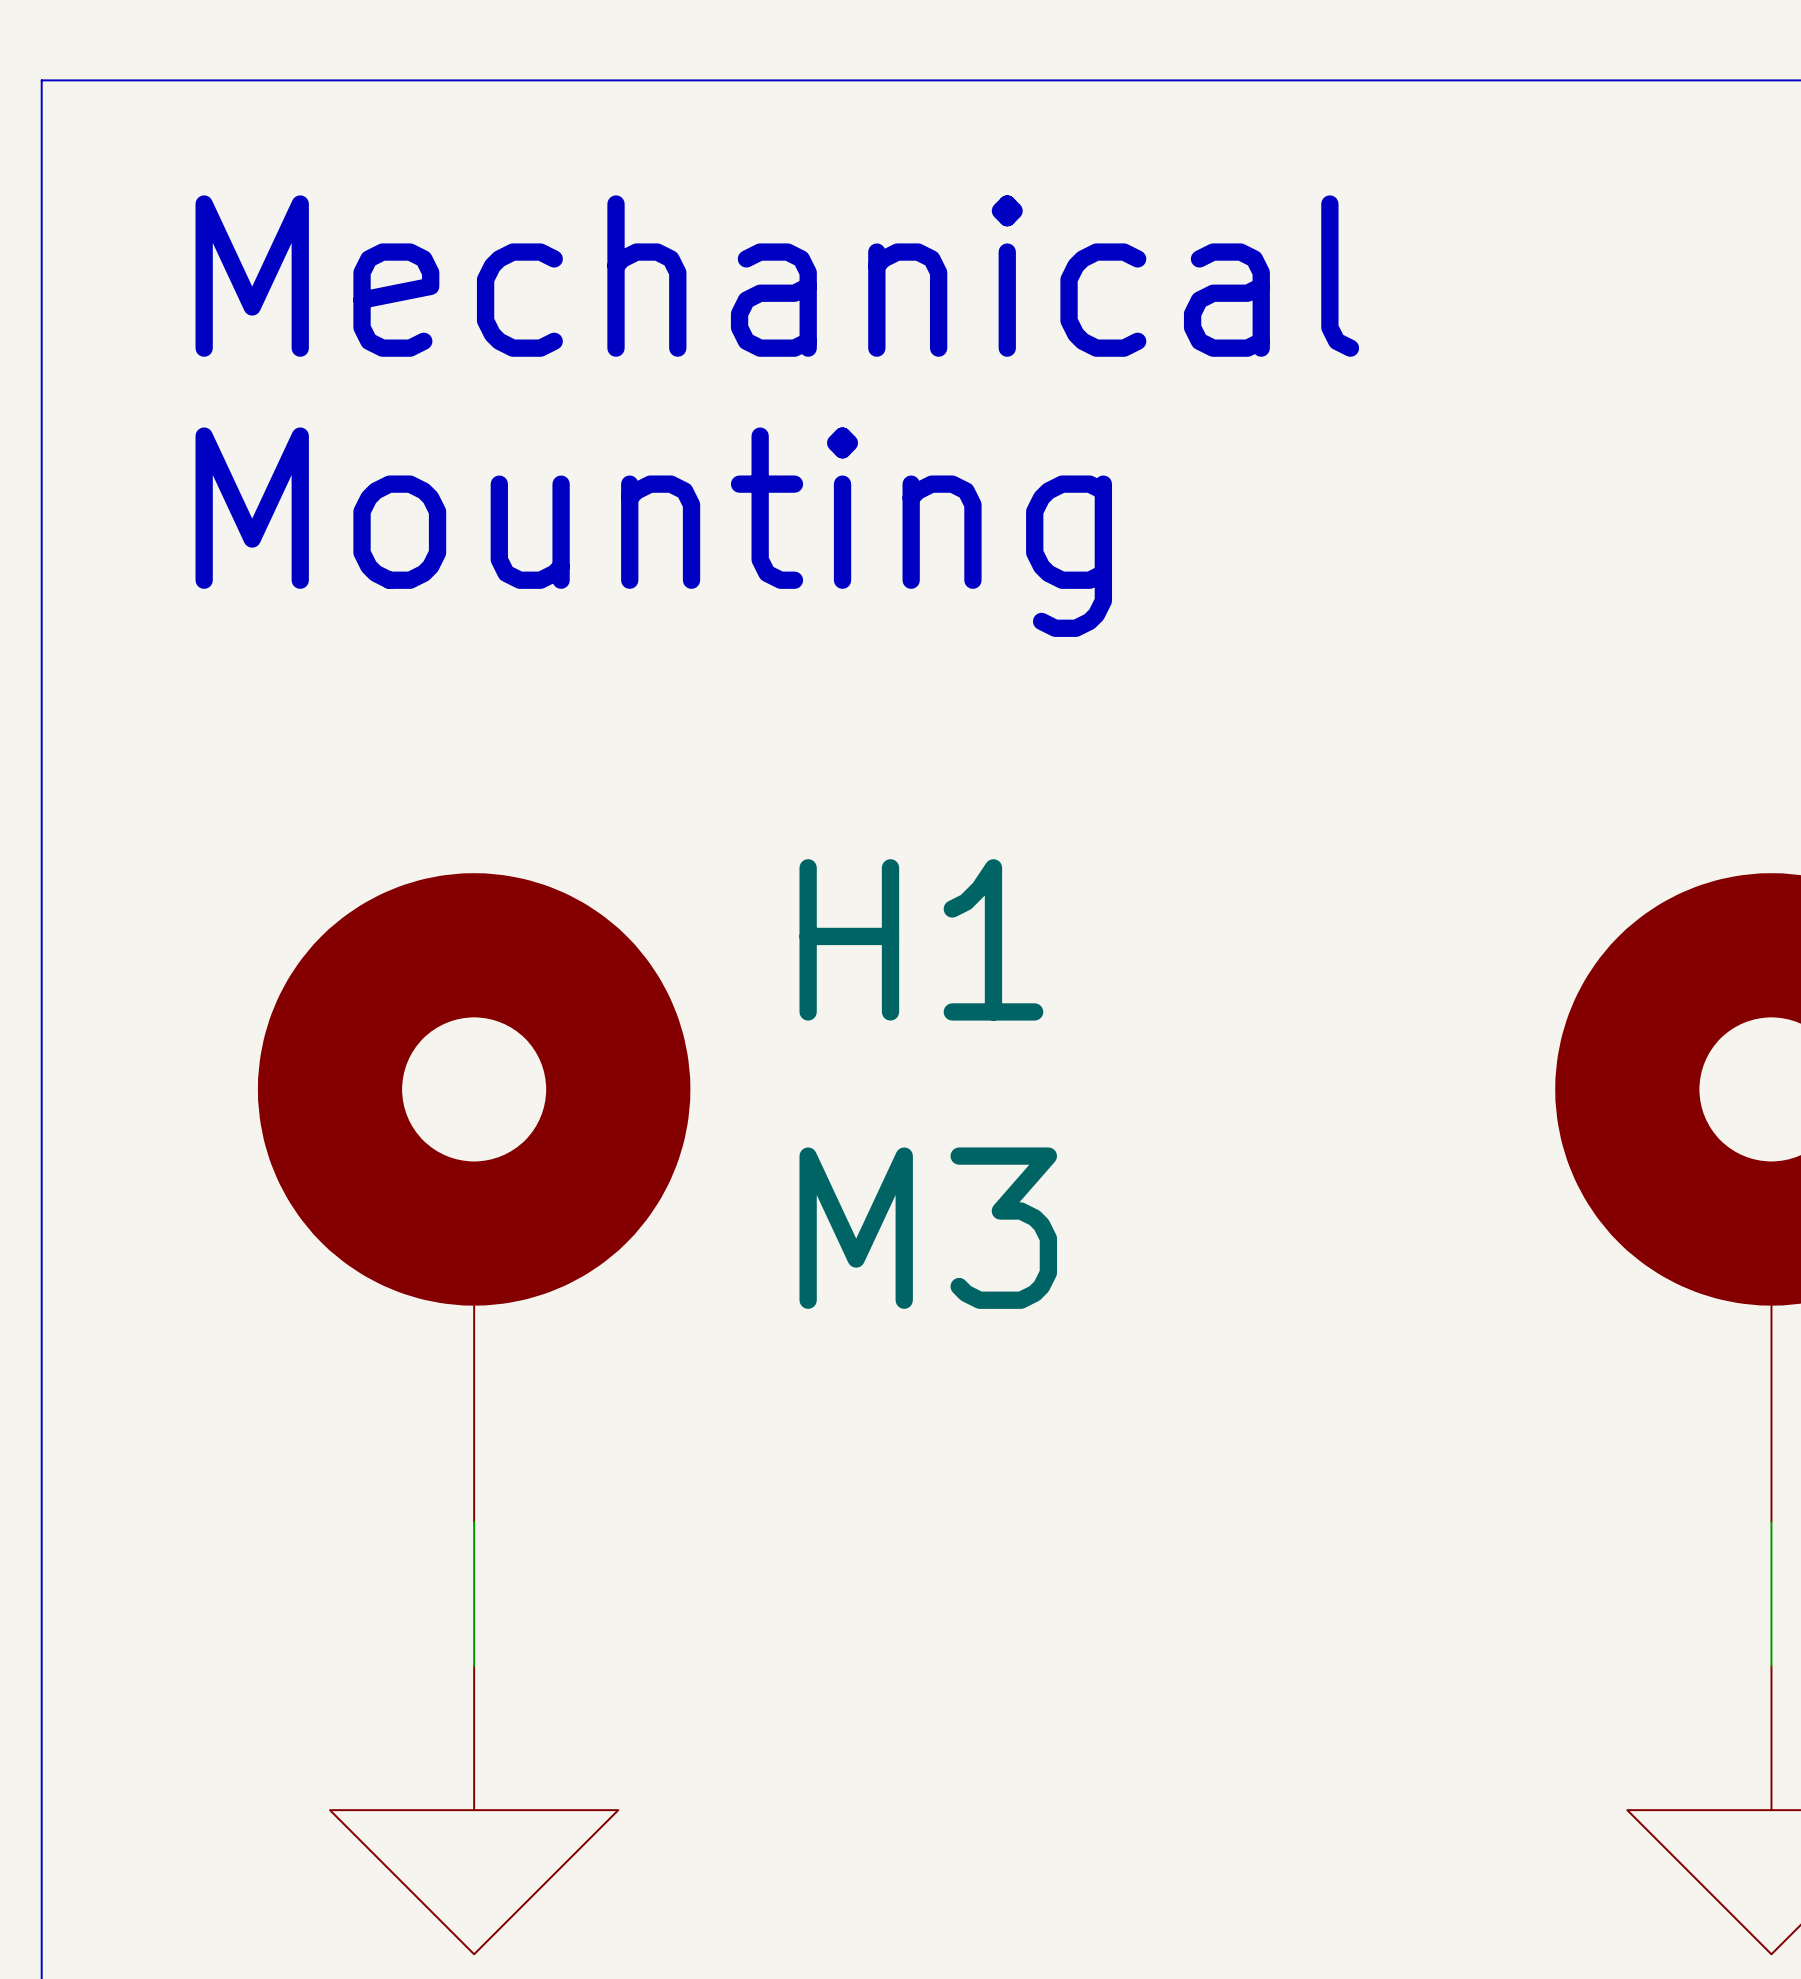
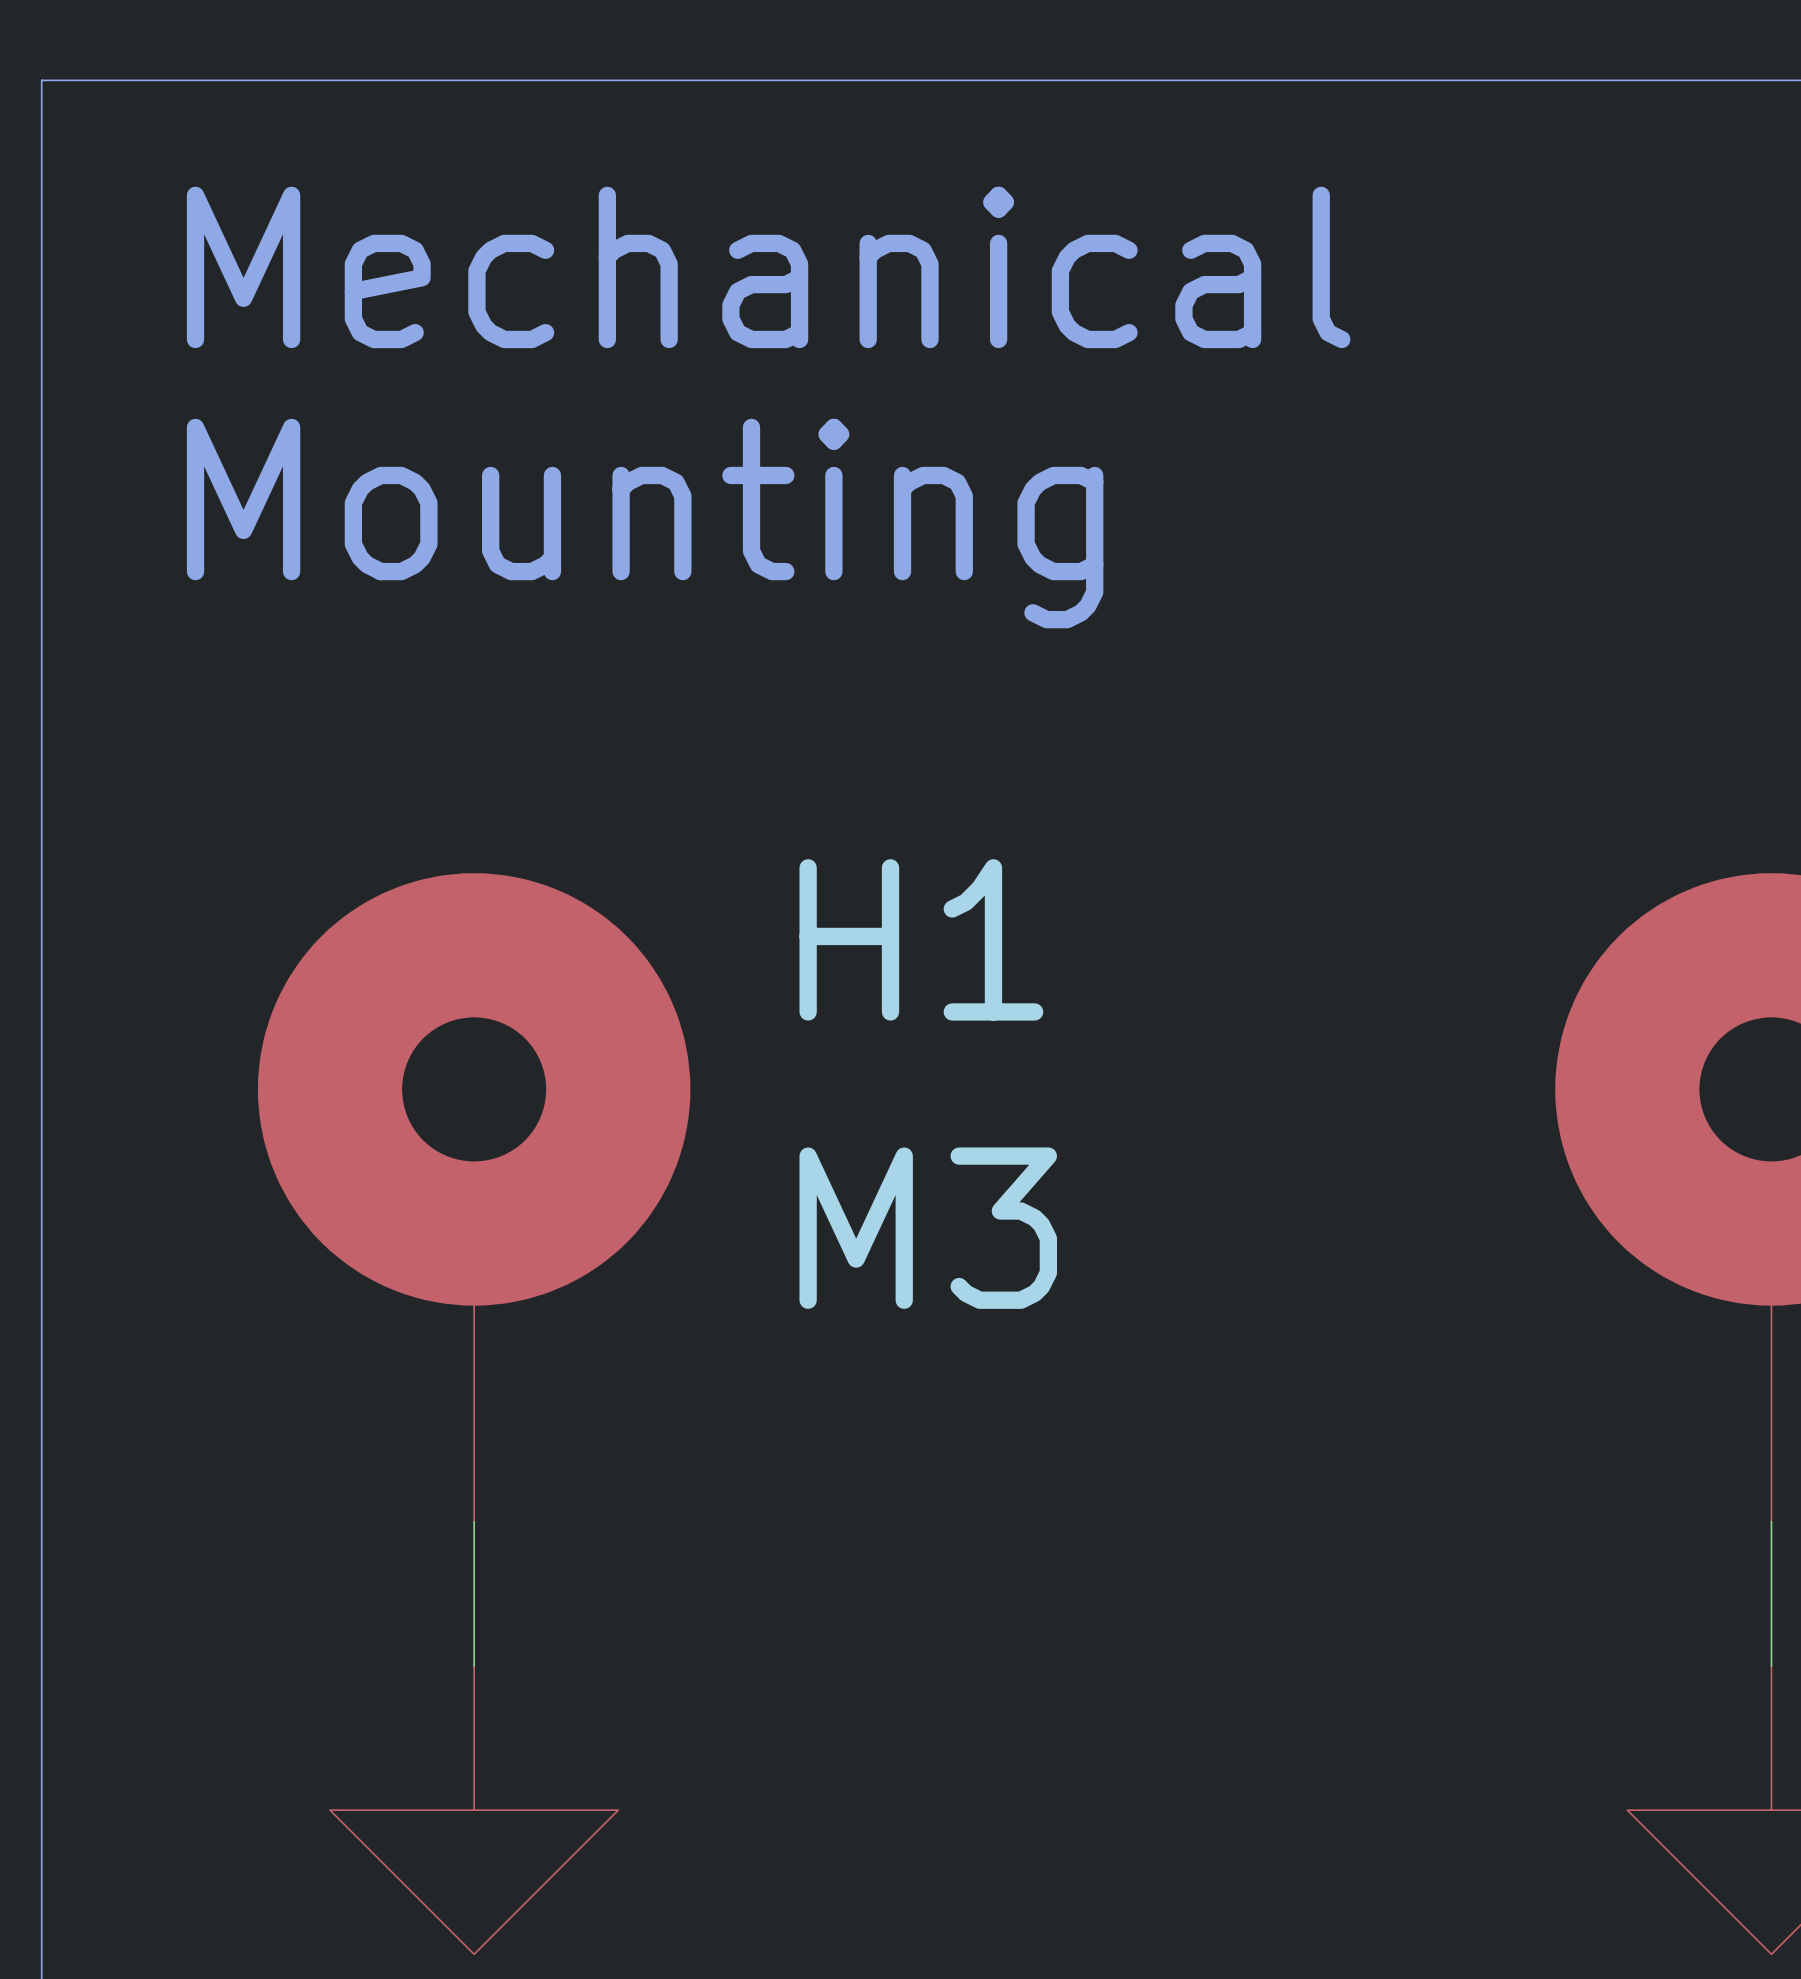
text position: Mechanical (777, 276) -> Mechanical (768, 267)
text position: Mounting (653, 532) -> Mounting (645, 523)

